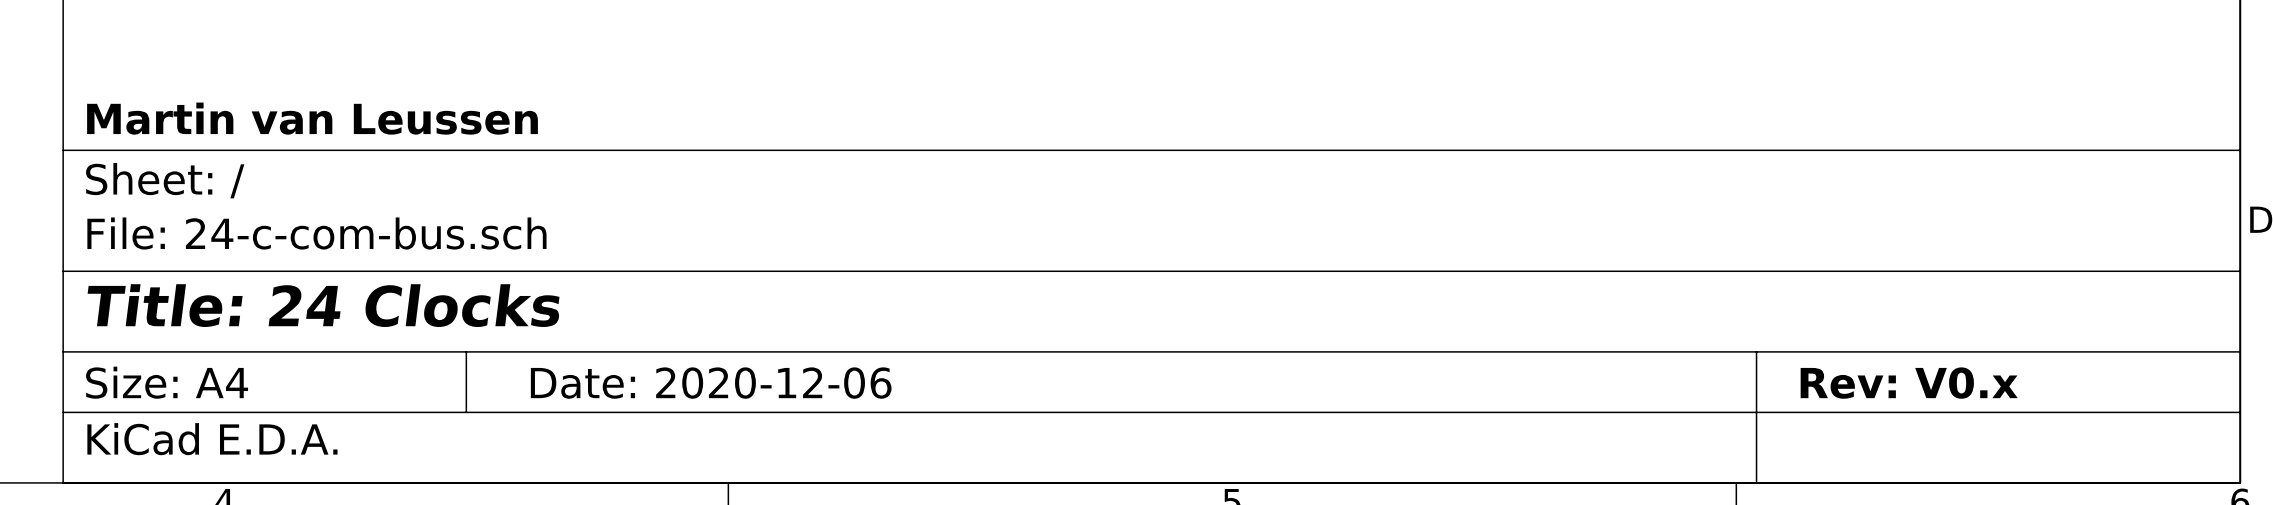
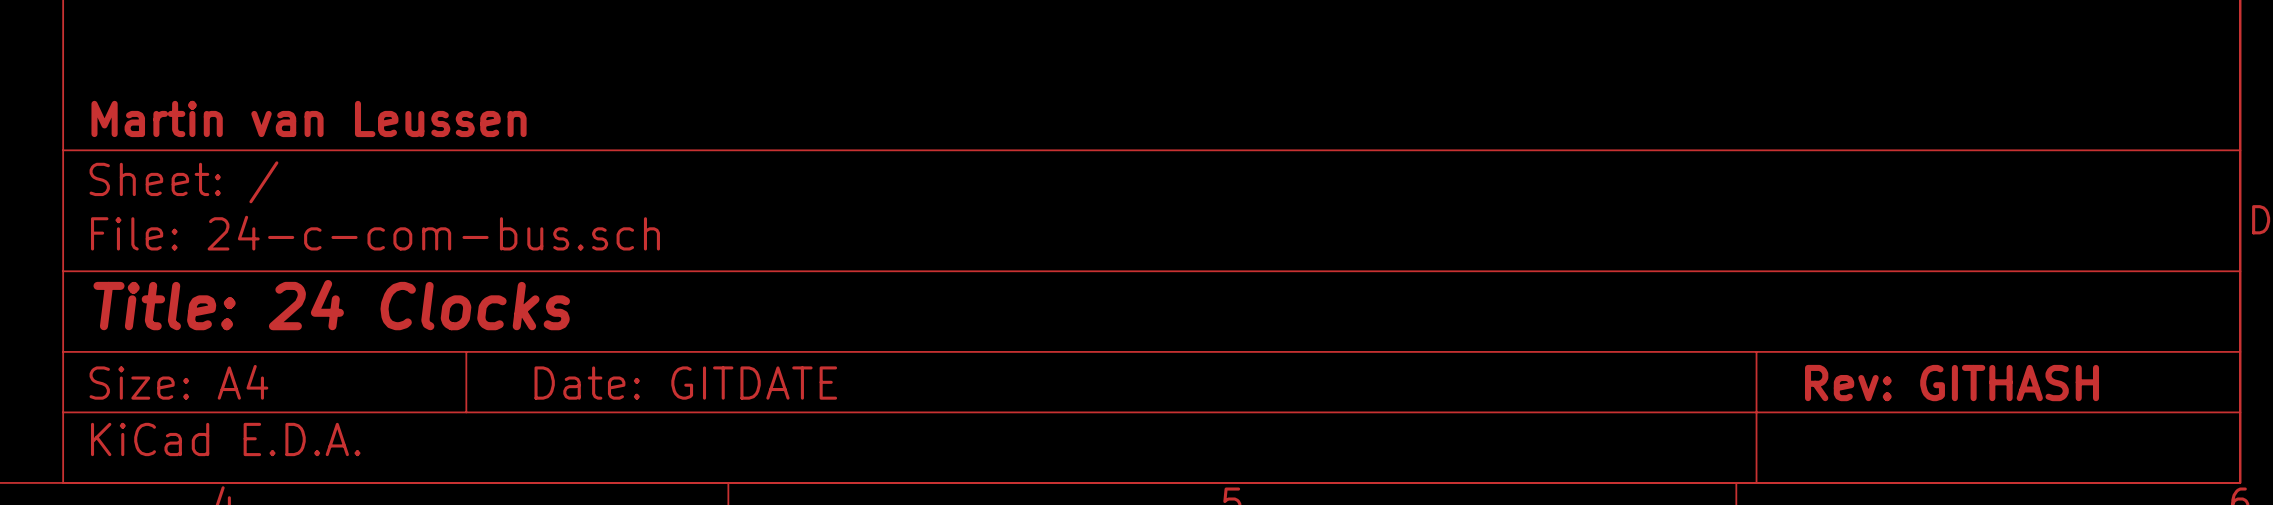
title block: Date: 2020-12-06 (711, 383) -> Date: GITDATE (685, 383)
title block: Rev: V0.x (1909, 383) -> Rev: GITHASH (1952, 383)

